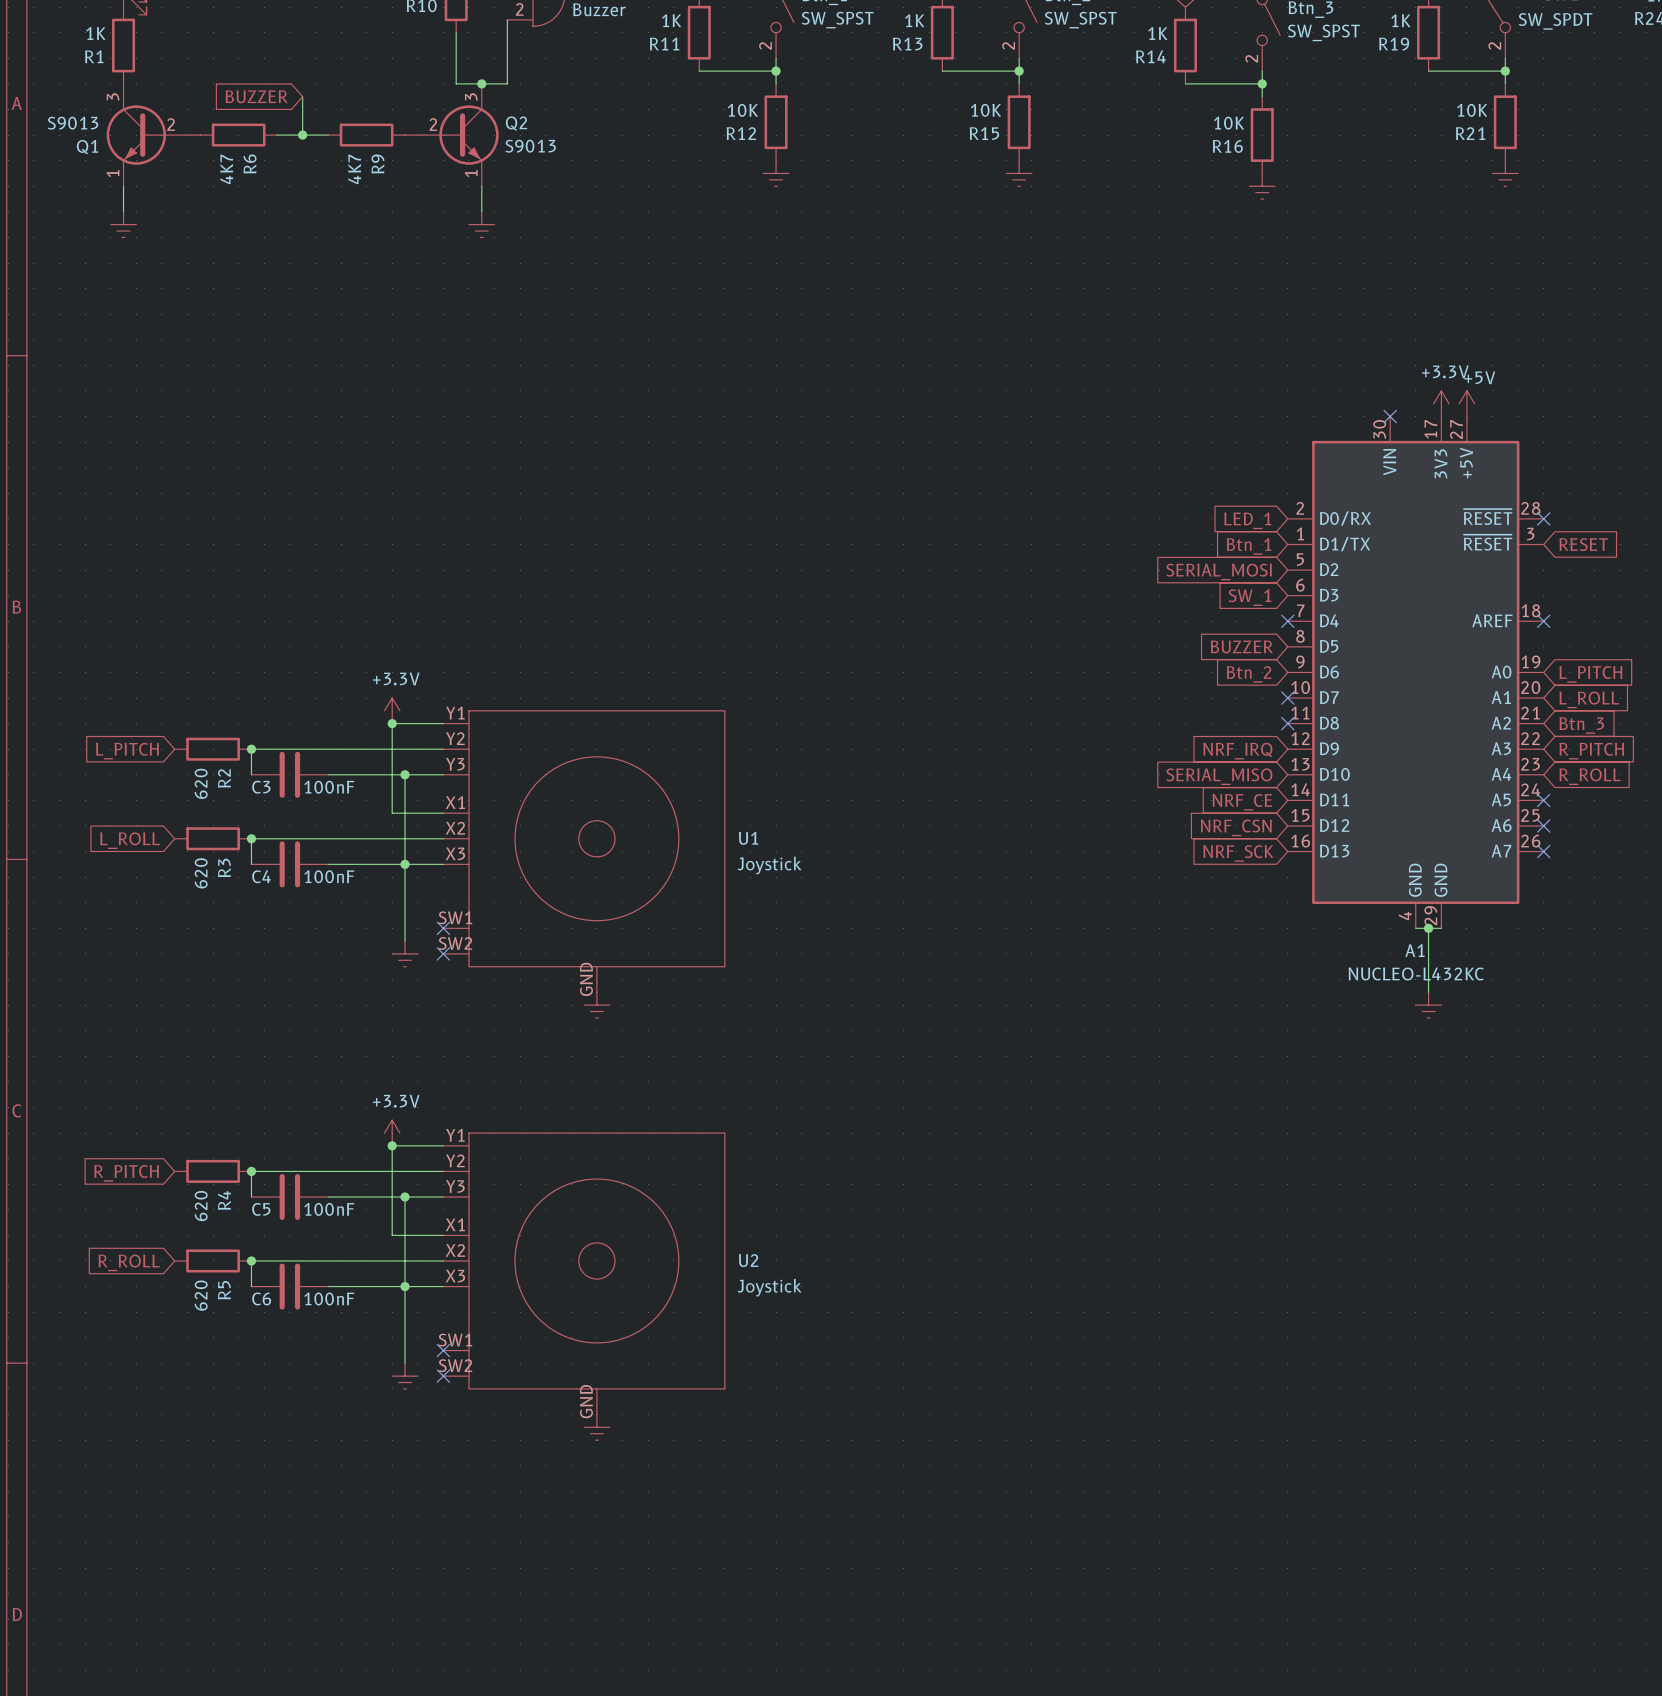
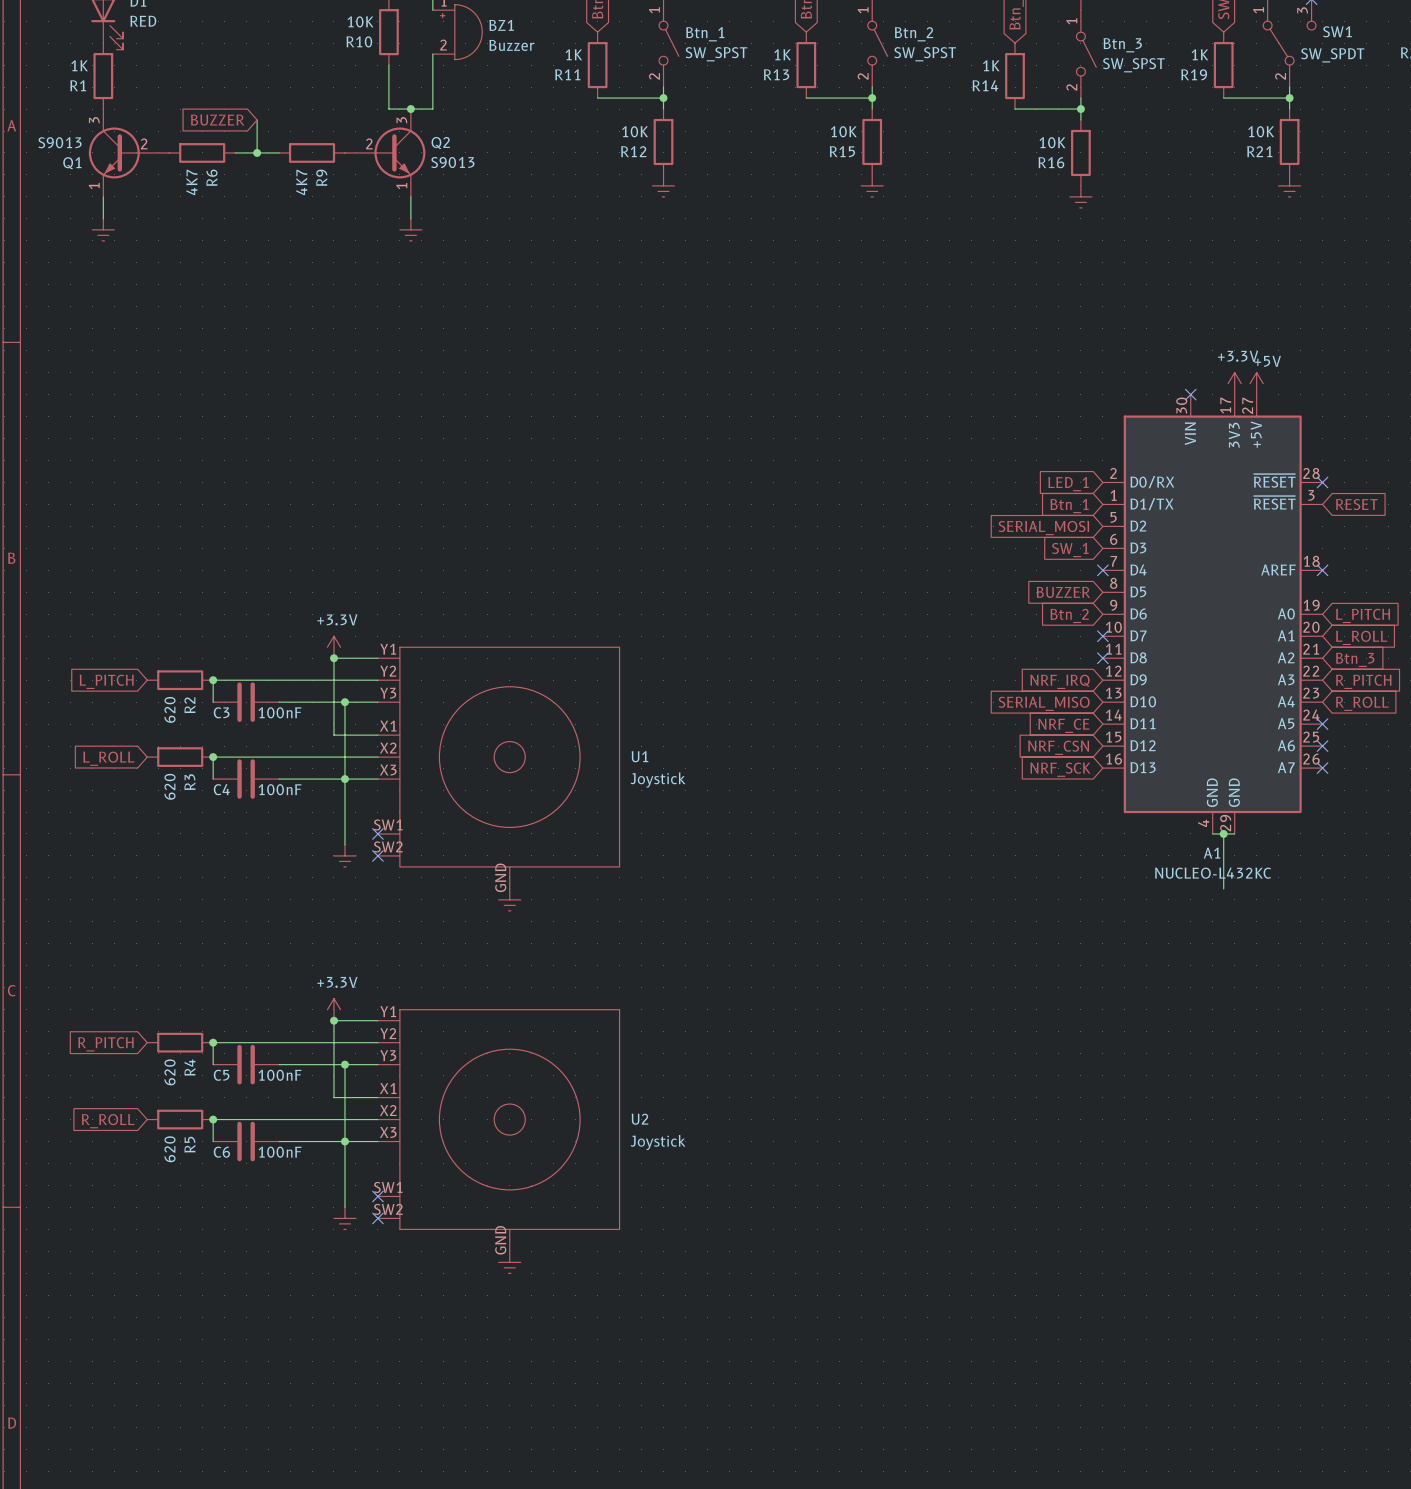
power symbol: (1428, 1005) -> none

